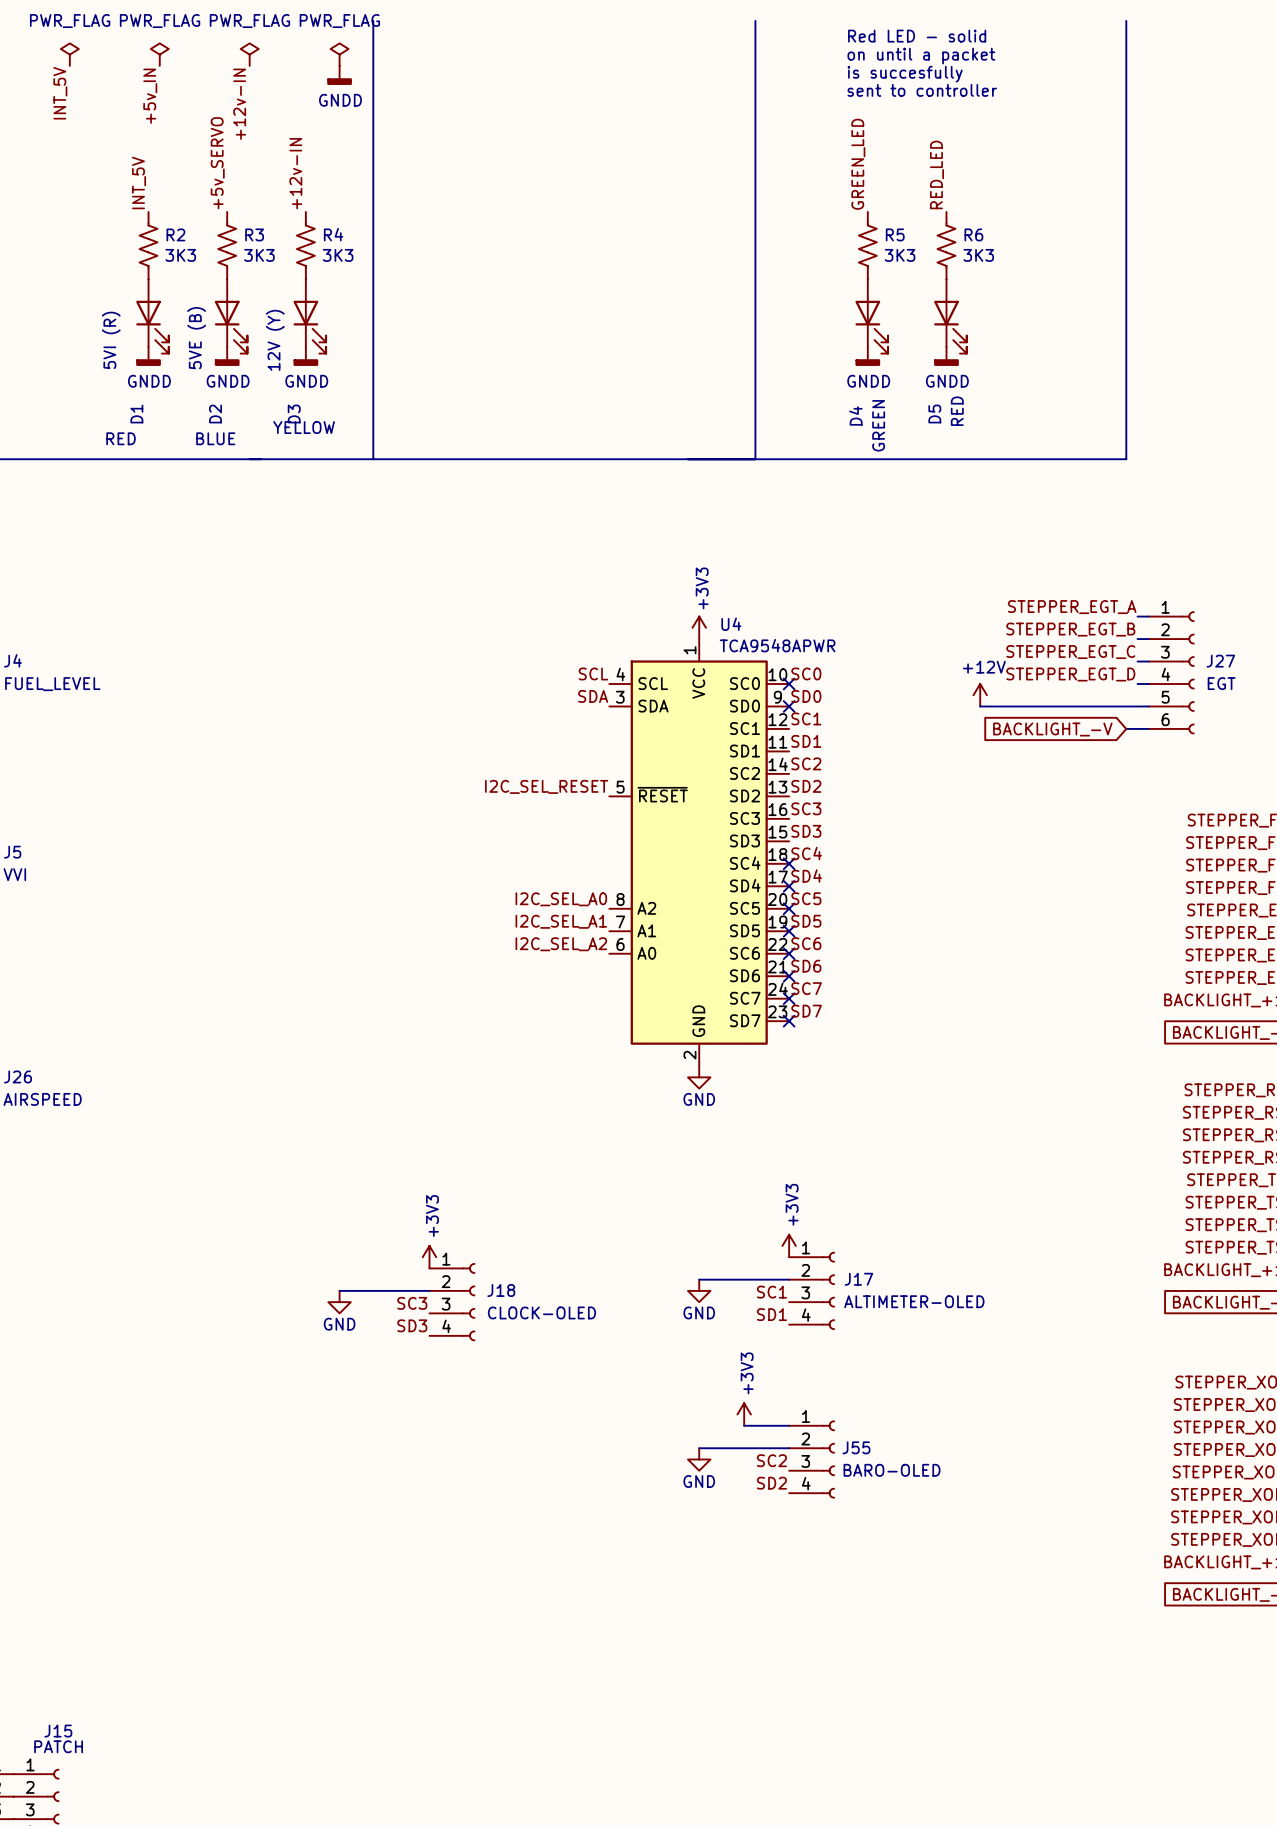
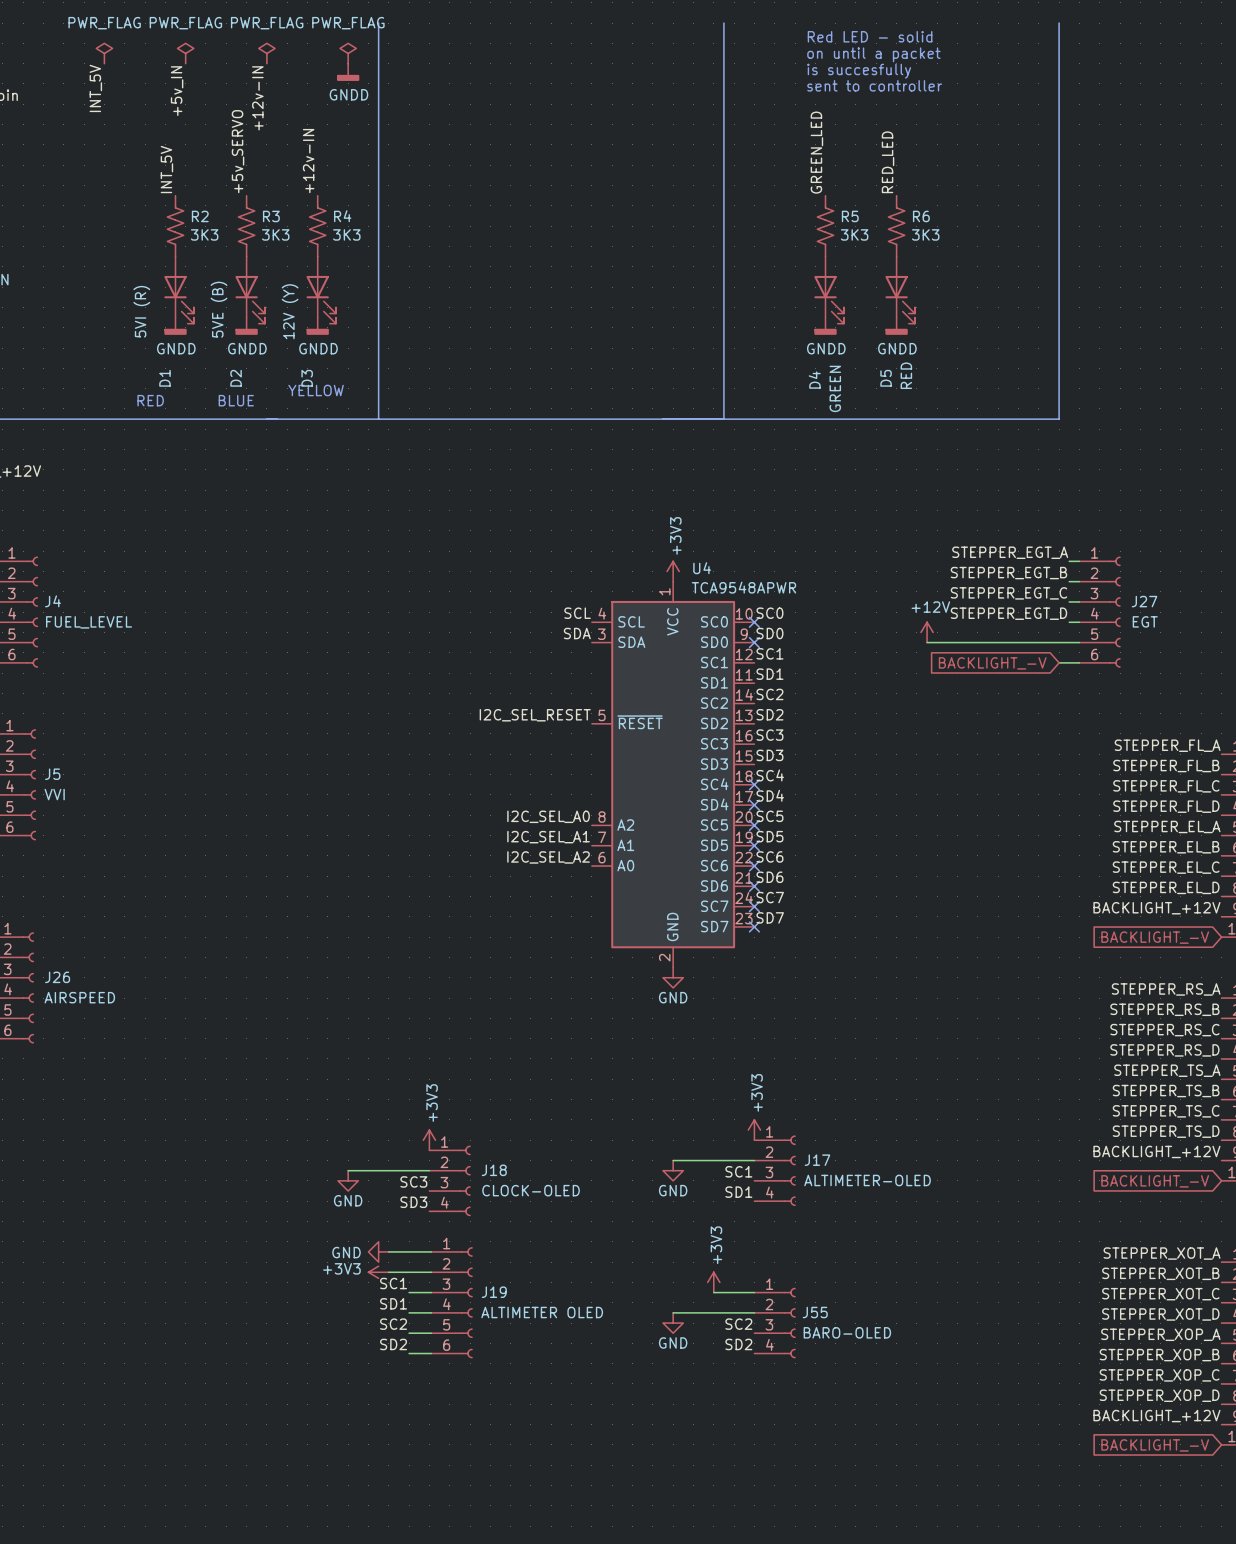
power symbol: none -> GND (378, 1251)
wire: none -> (388, 1251) (431, 1251)
power symbol: none -> +3V3 (378, 1272)
wire: none -> (388, 1272) (431, 1272)
label: none -> SC1 (393, 1283)
wire: none -> (409, 1292) (431, 1292)
J19: none -> ALTIMETER OLED (452, 1302)
label: none -> SD1 (393, 1303)
wire: none -> (409, 1312) (431, 1312)
label: none -> SC2 (393, 1324)
wire: none -> (409, 1333) (431, 1333)
label: none -> SD2 (393, 1344)
wire: none -> (409, 1353) (431, 1353)

